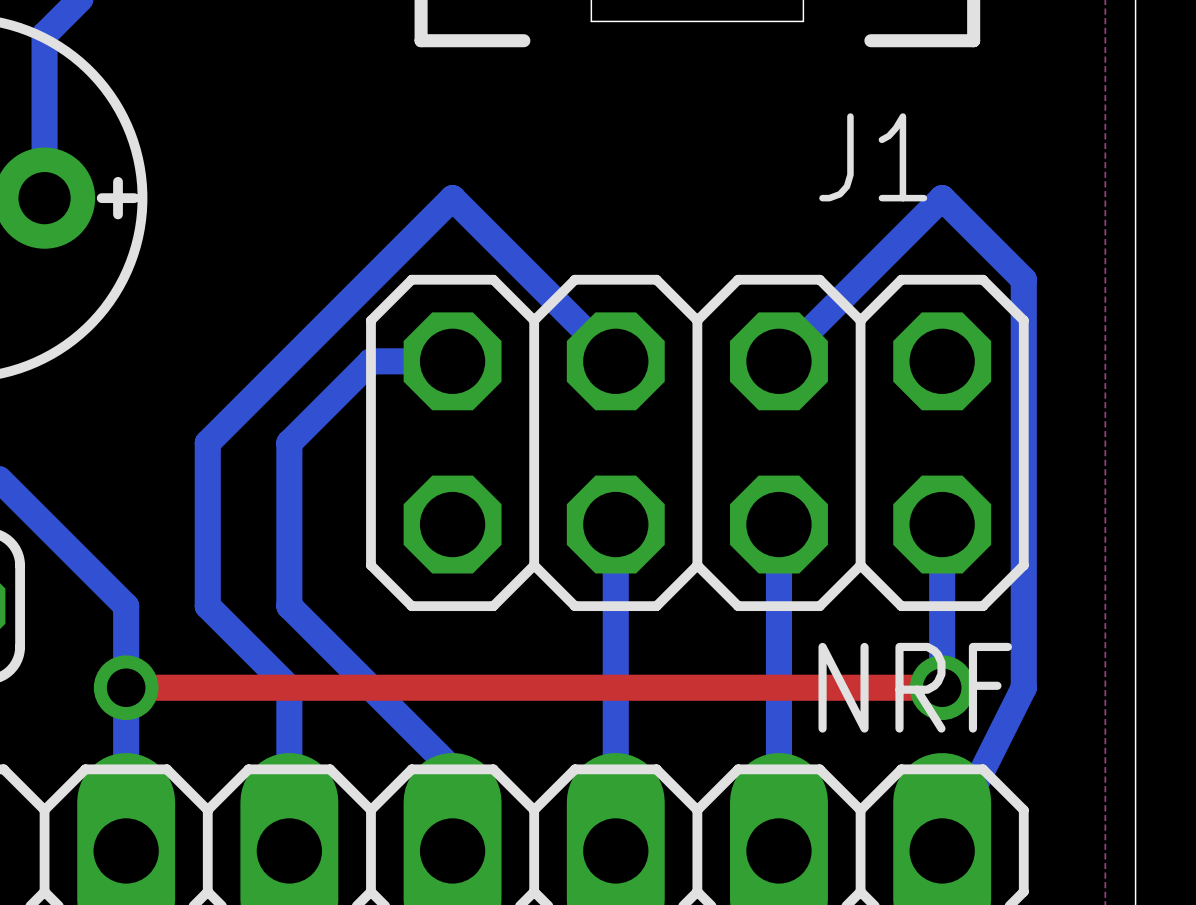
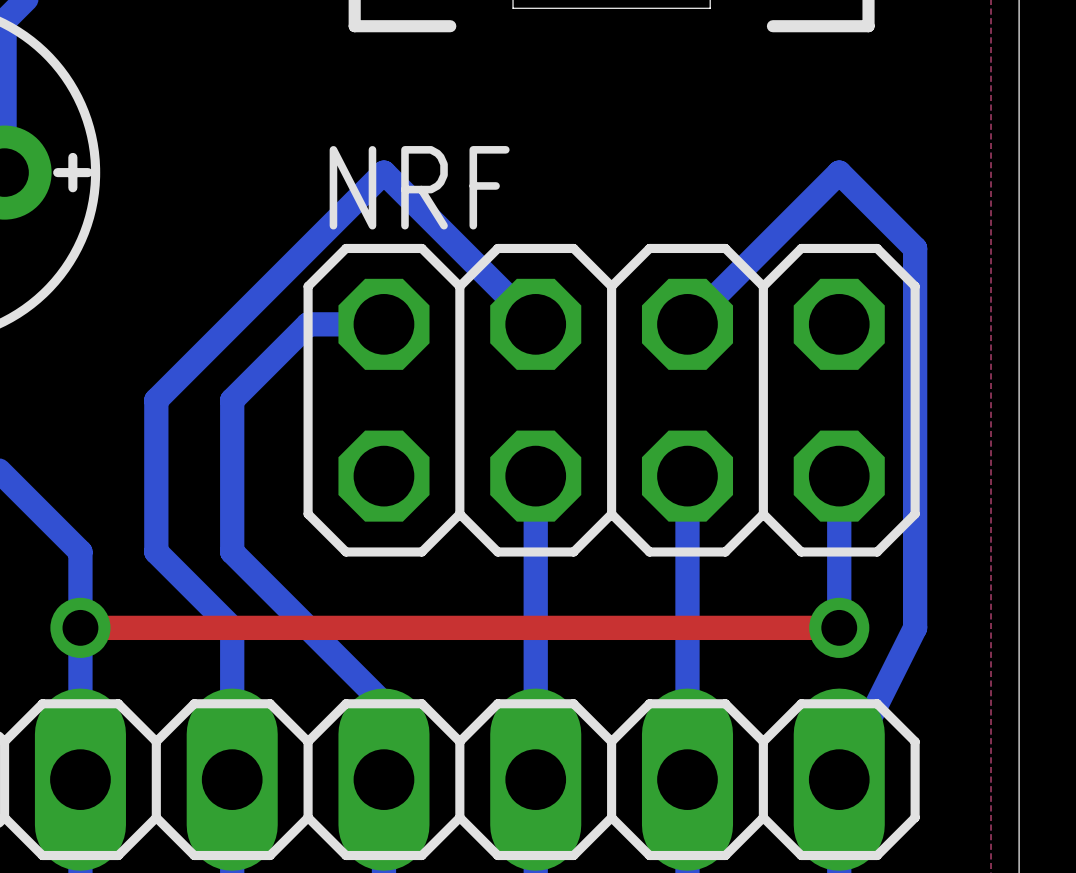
J1 name: J1 (873, 157) -> none
NRF name position: NRF (915, 687) -> NRF (419, 187)

